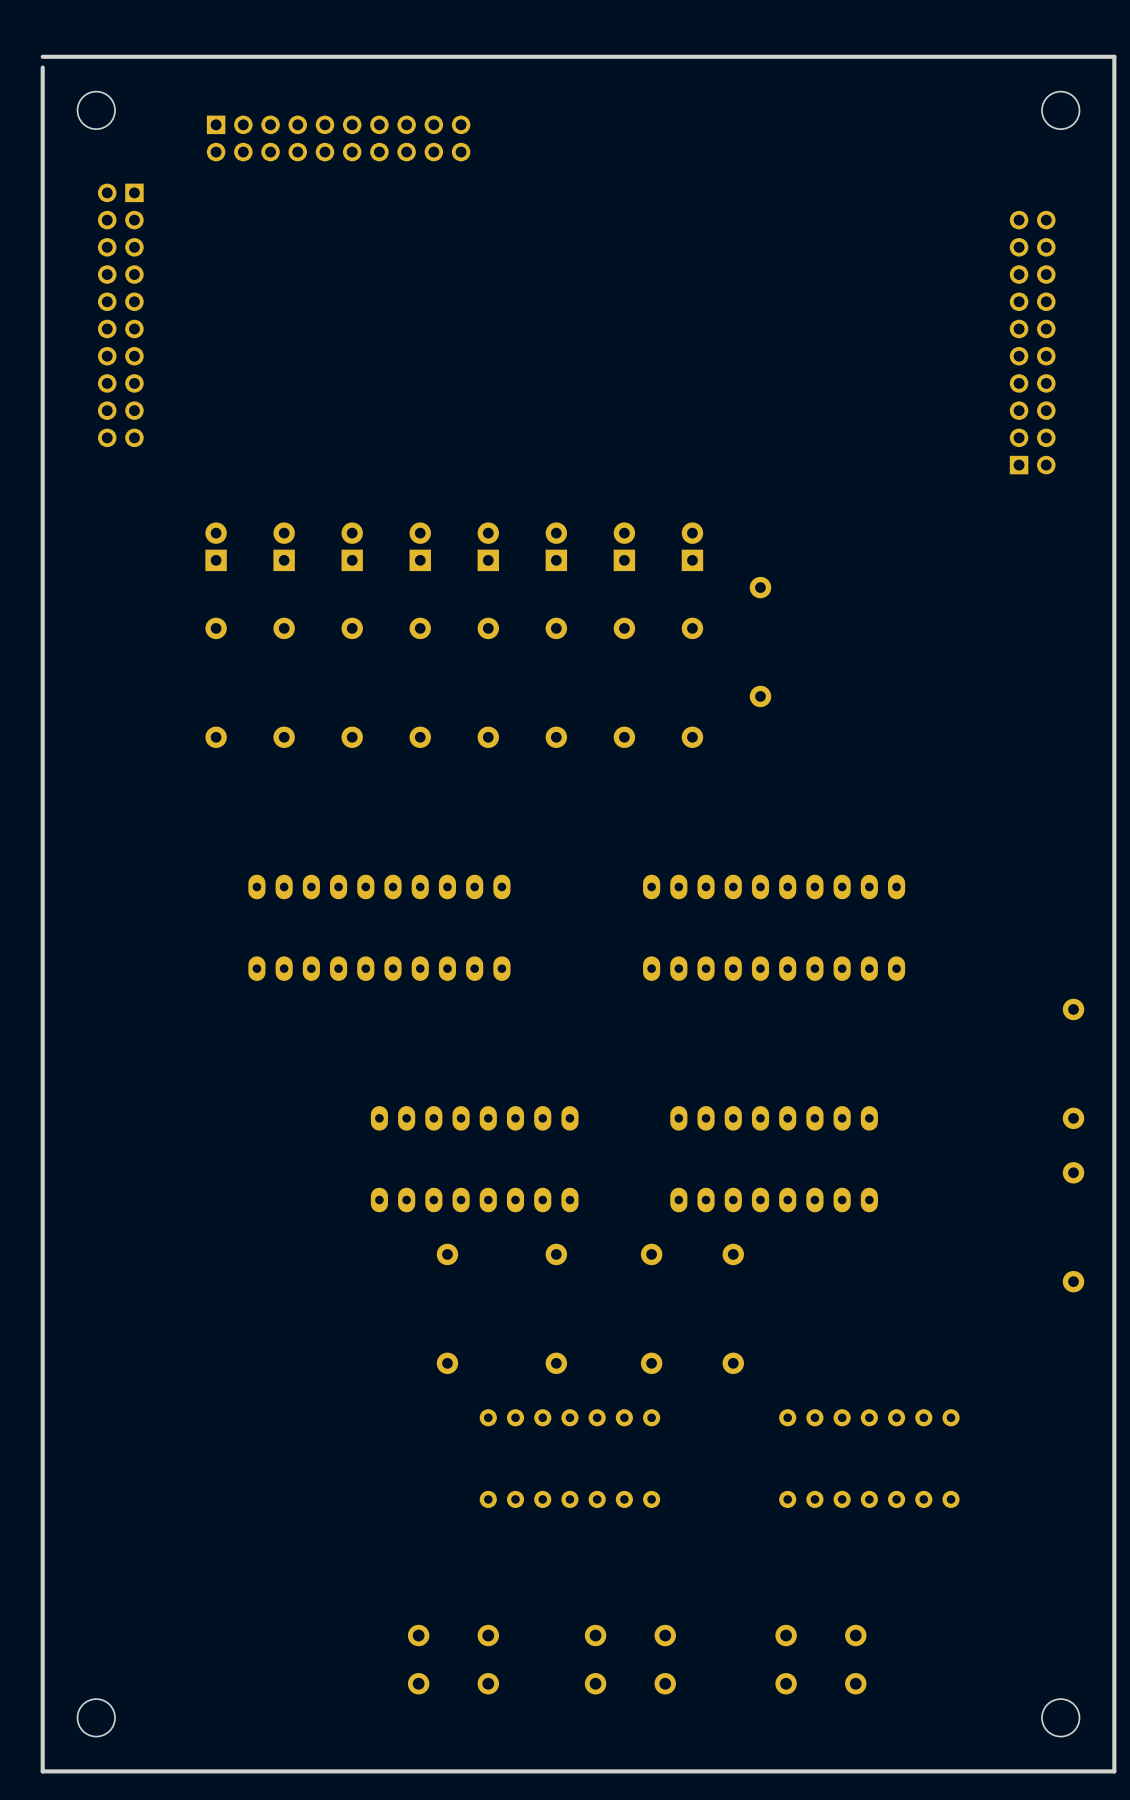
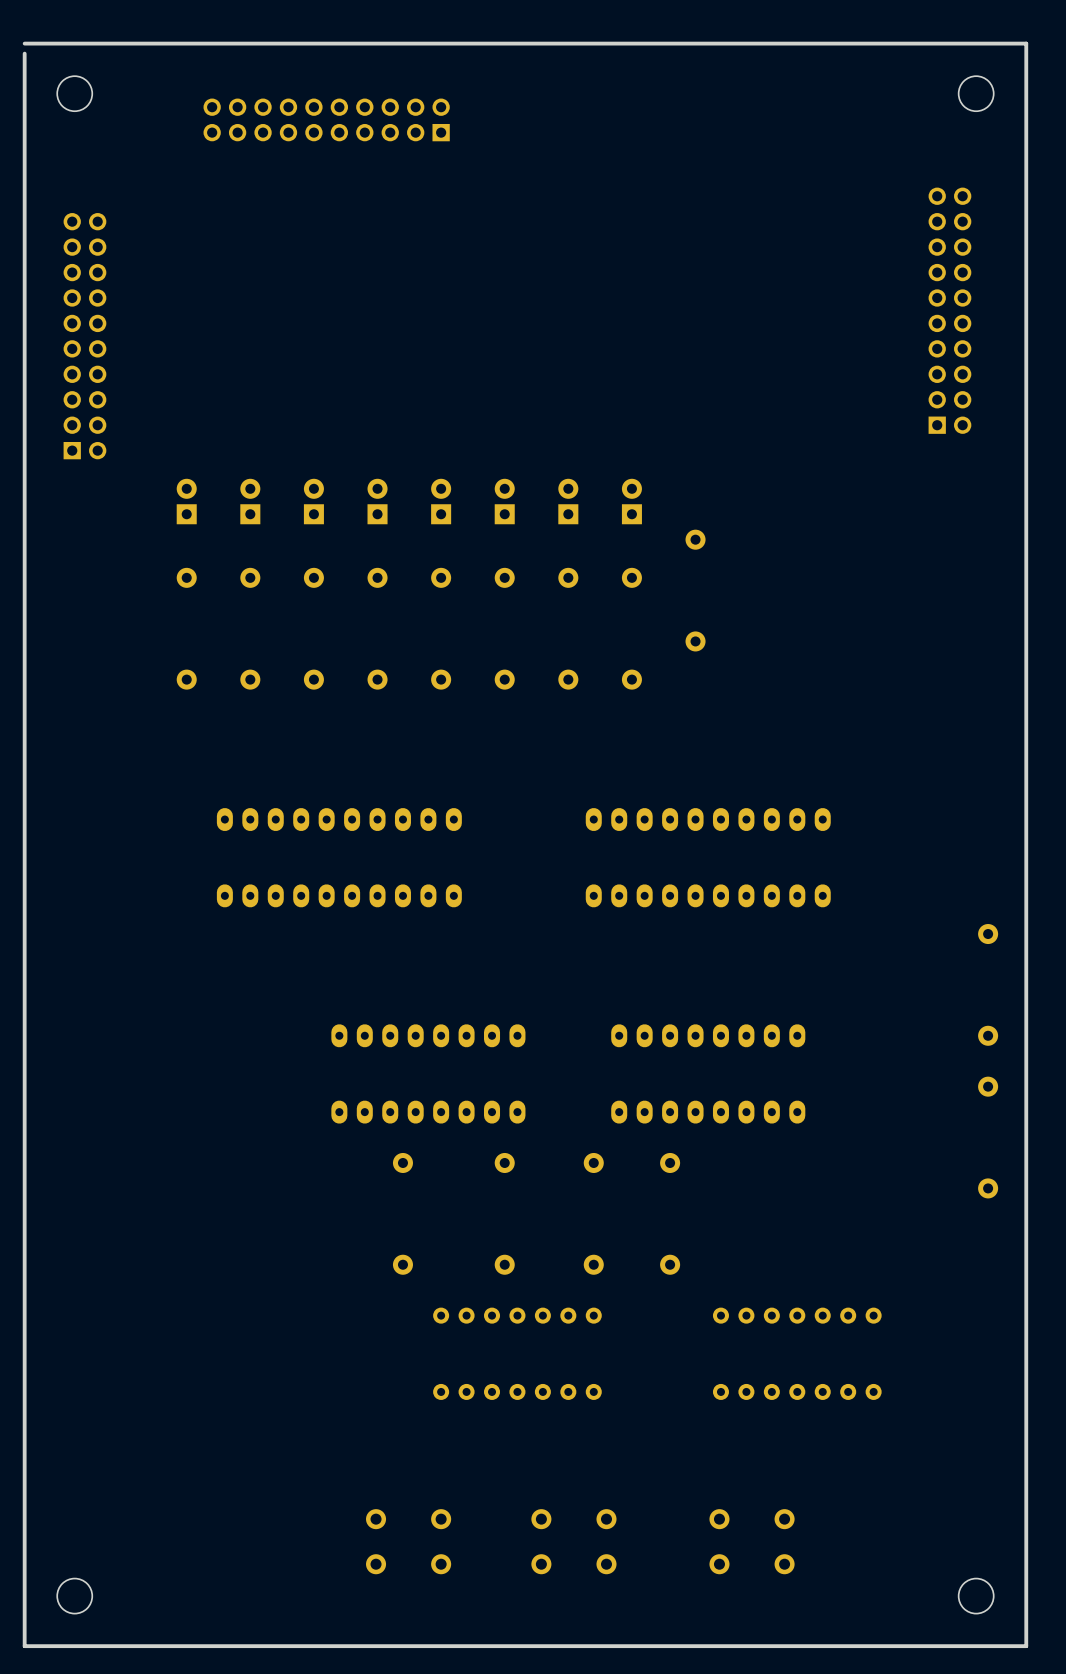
part rotation: 0° (338, 138) -> 180° (326, 119)
part rotation: 0° (120, 315) -> 180° (84, 336)

